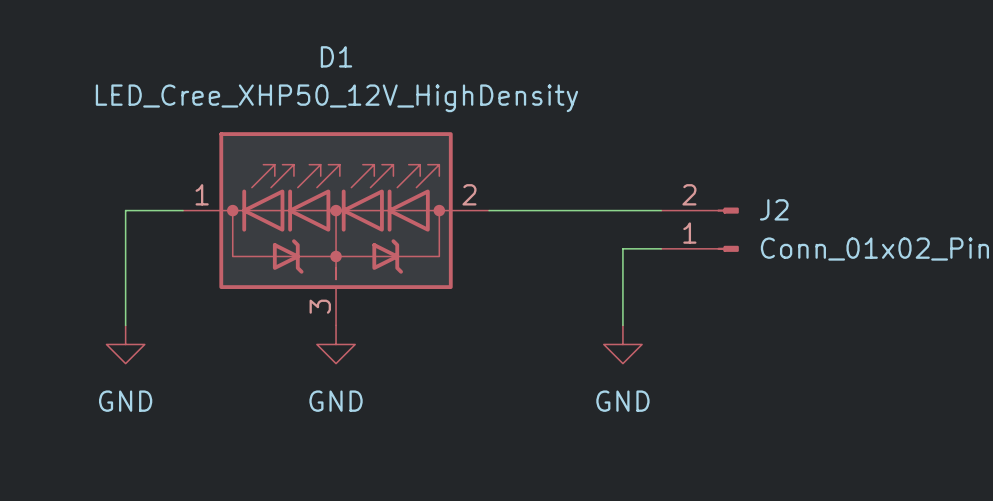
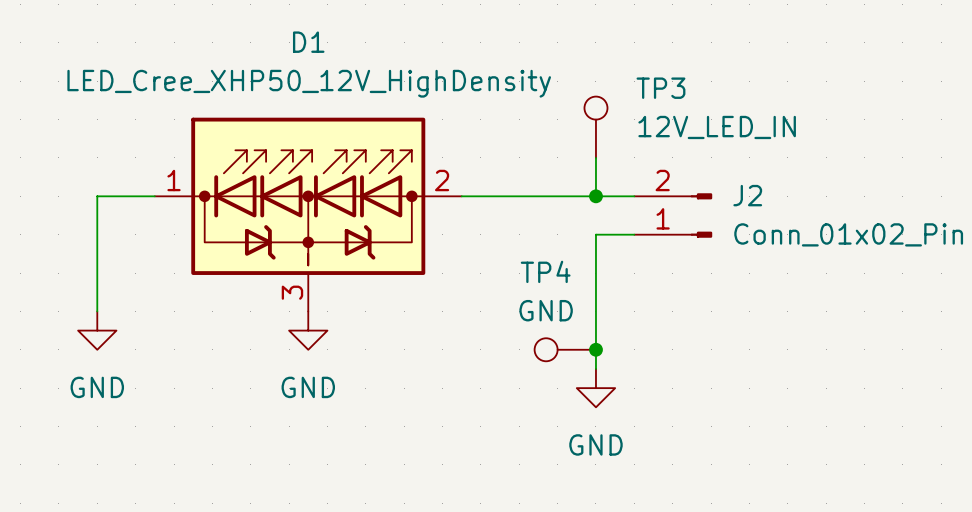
TP3: none -> 12V_LED_IN (595, 127)
wire: none -> (595, 157) (595, 196)
junction: none -> (595, 196)
wire: none -> (595, 311) (595, 368)
power symbol position: GND (622, 344) -> GND (595, 388)
TP4: none -> GND (565, 349)
junction: none -> (595, 349)

